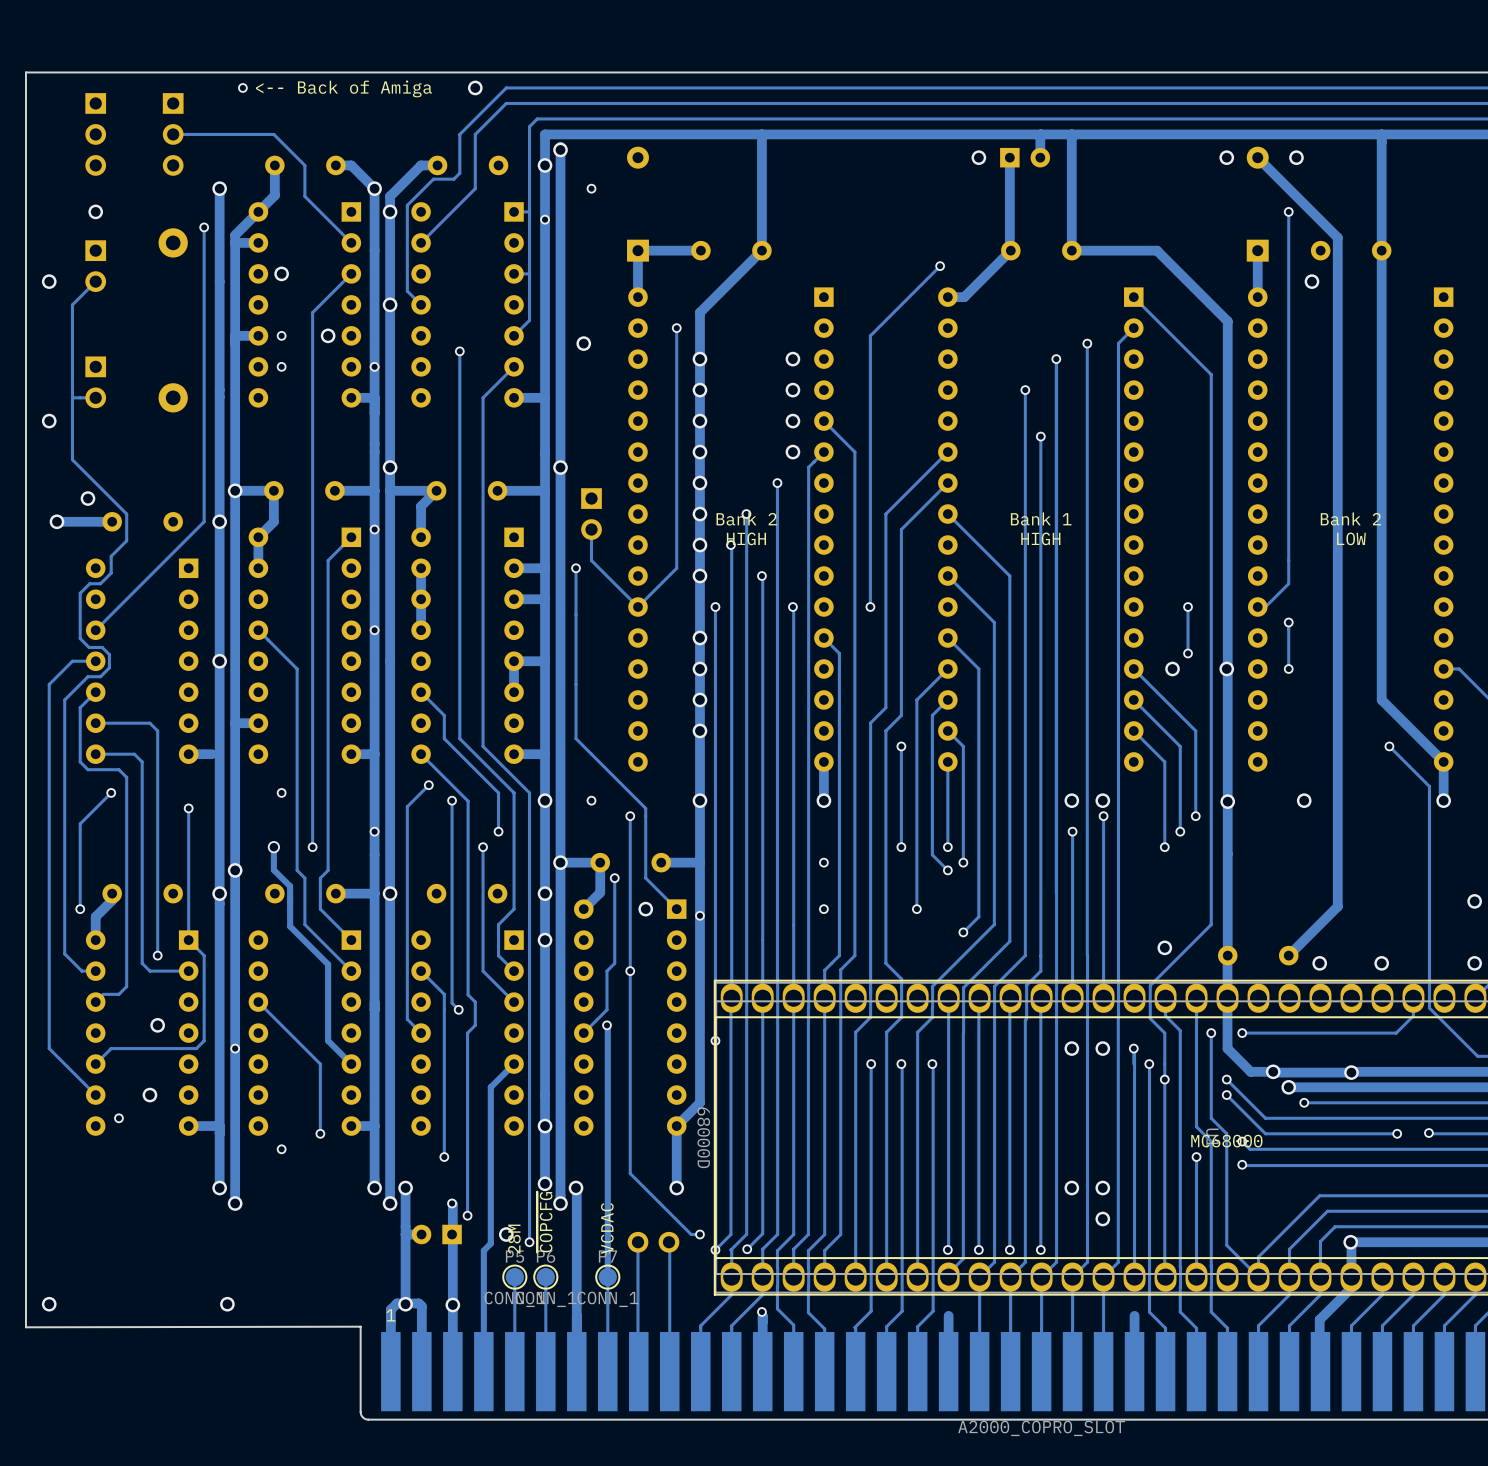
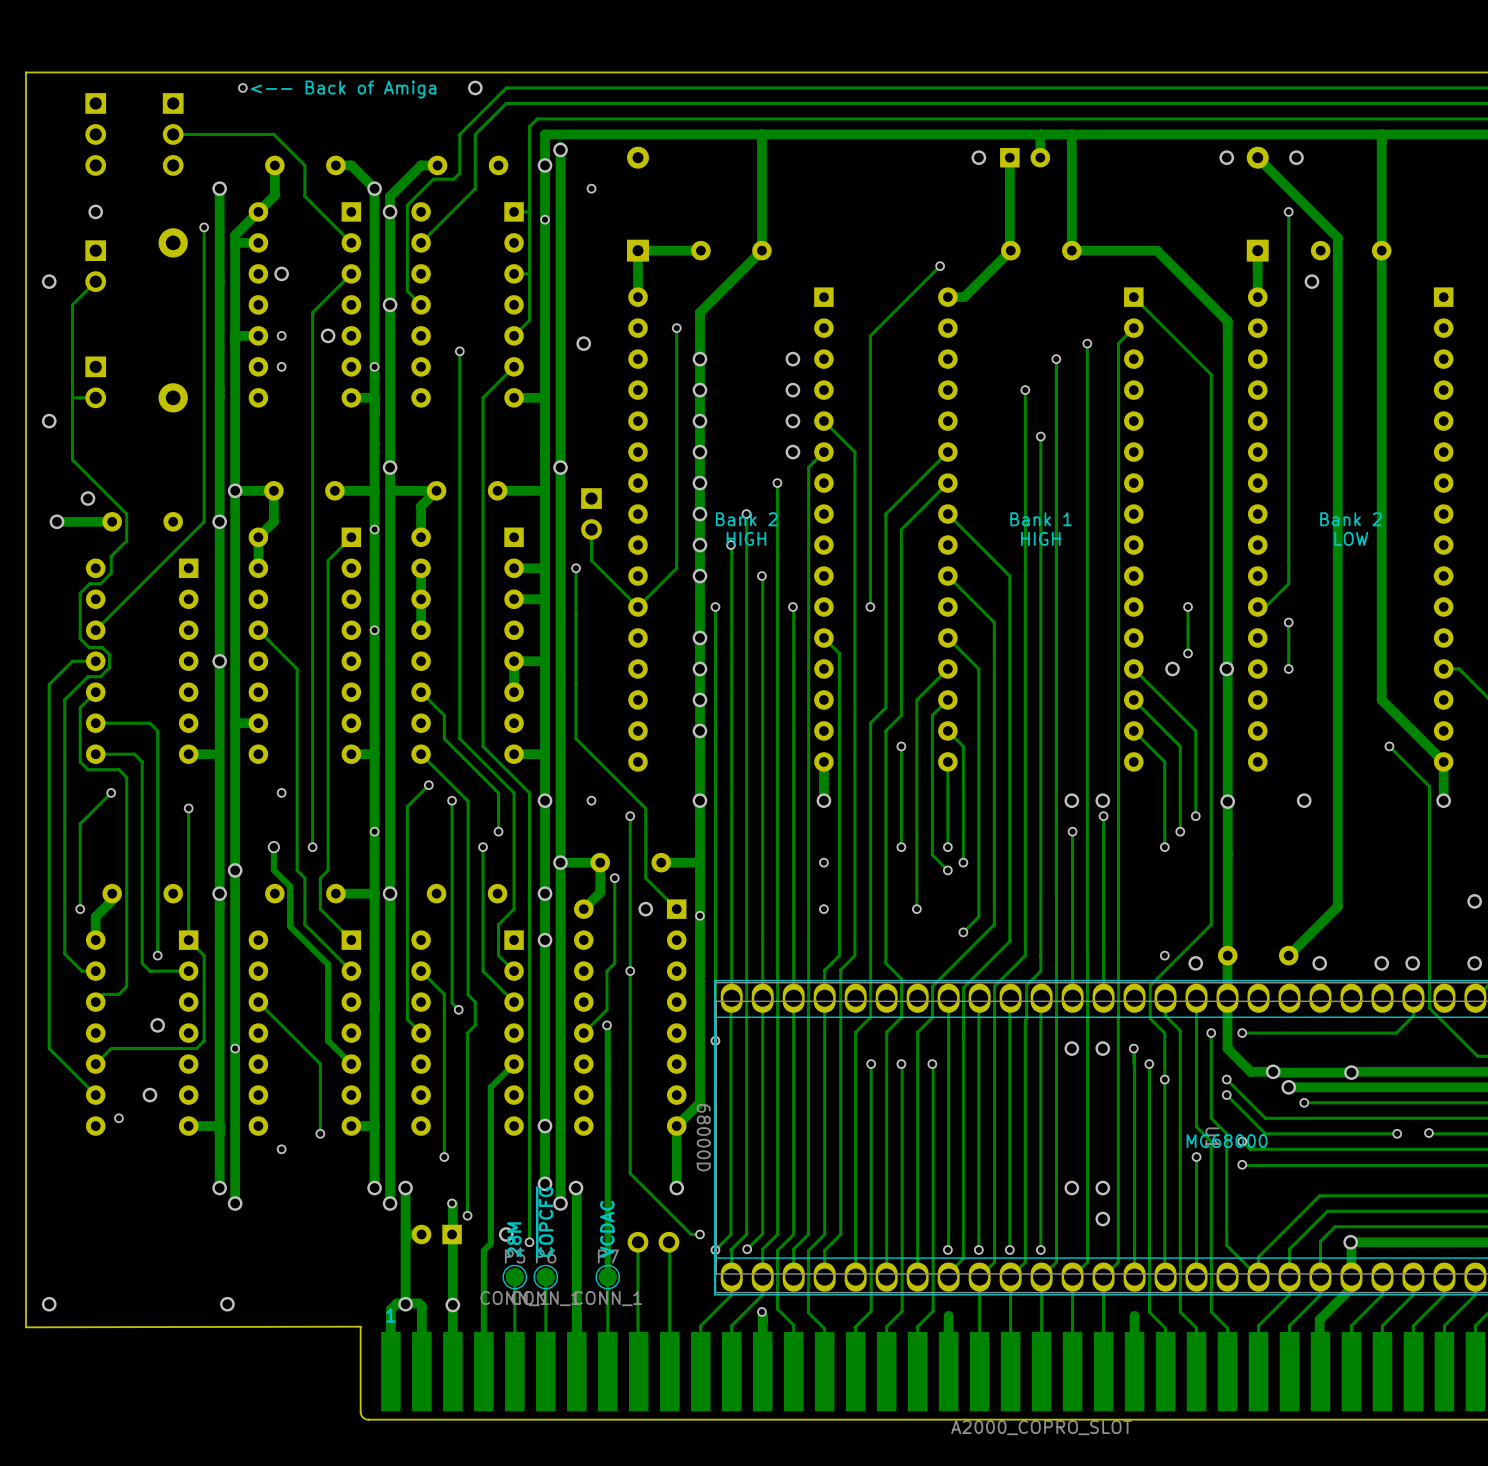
via position: (1164, 947) -> (1195, 963)
via: none -> (1164, 955)
via: none -> (1412, 963)

